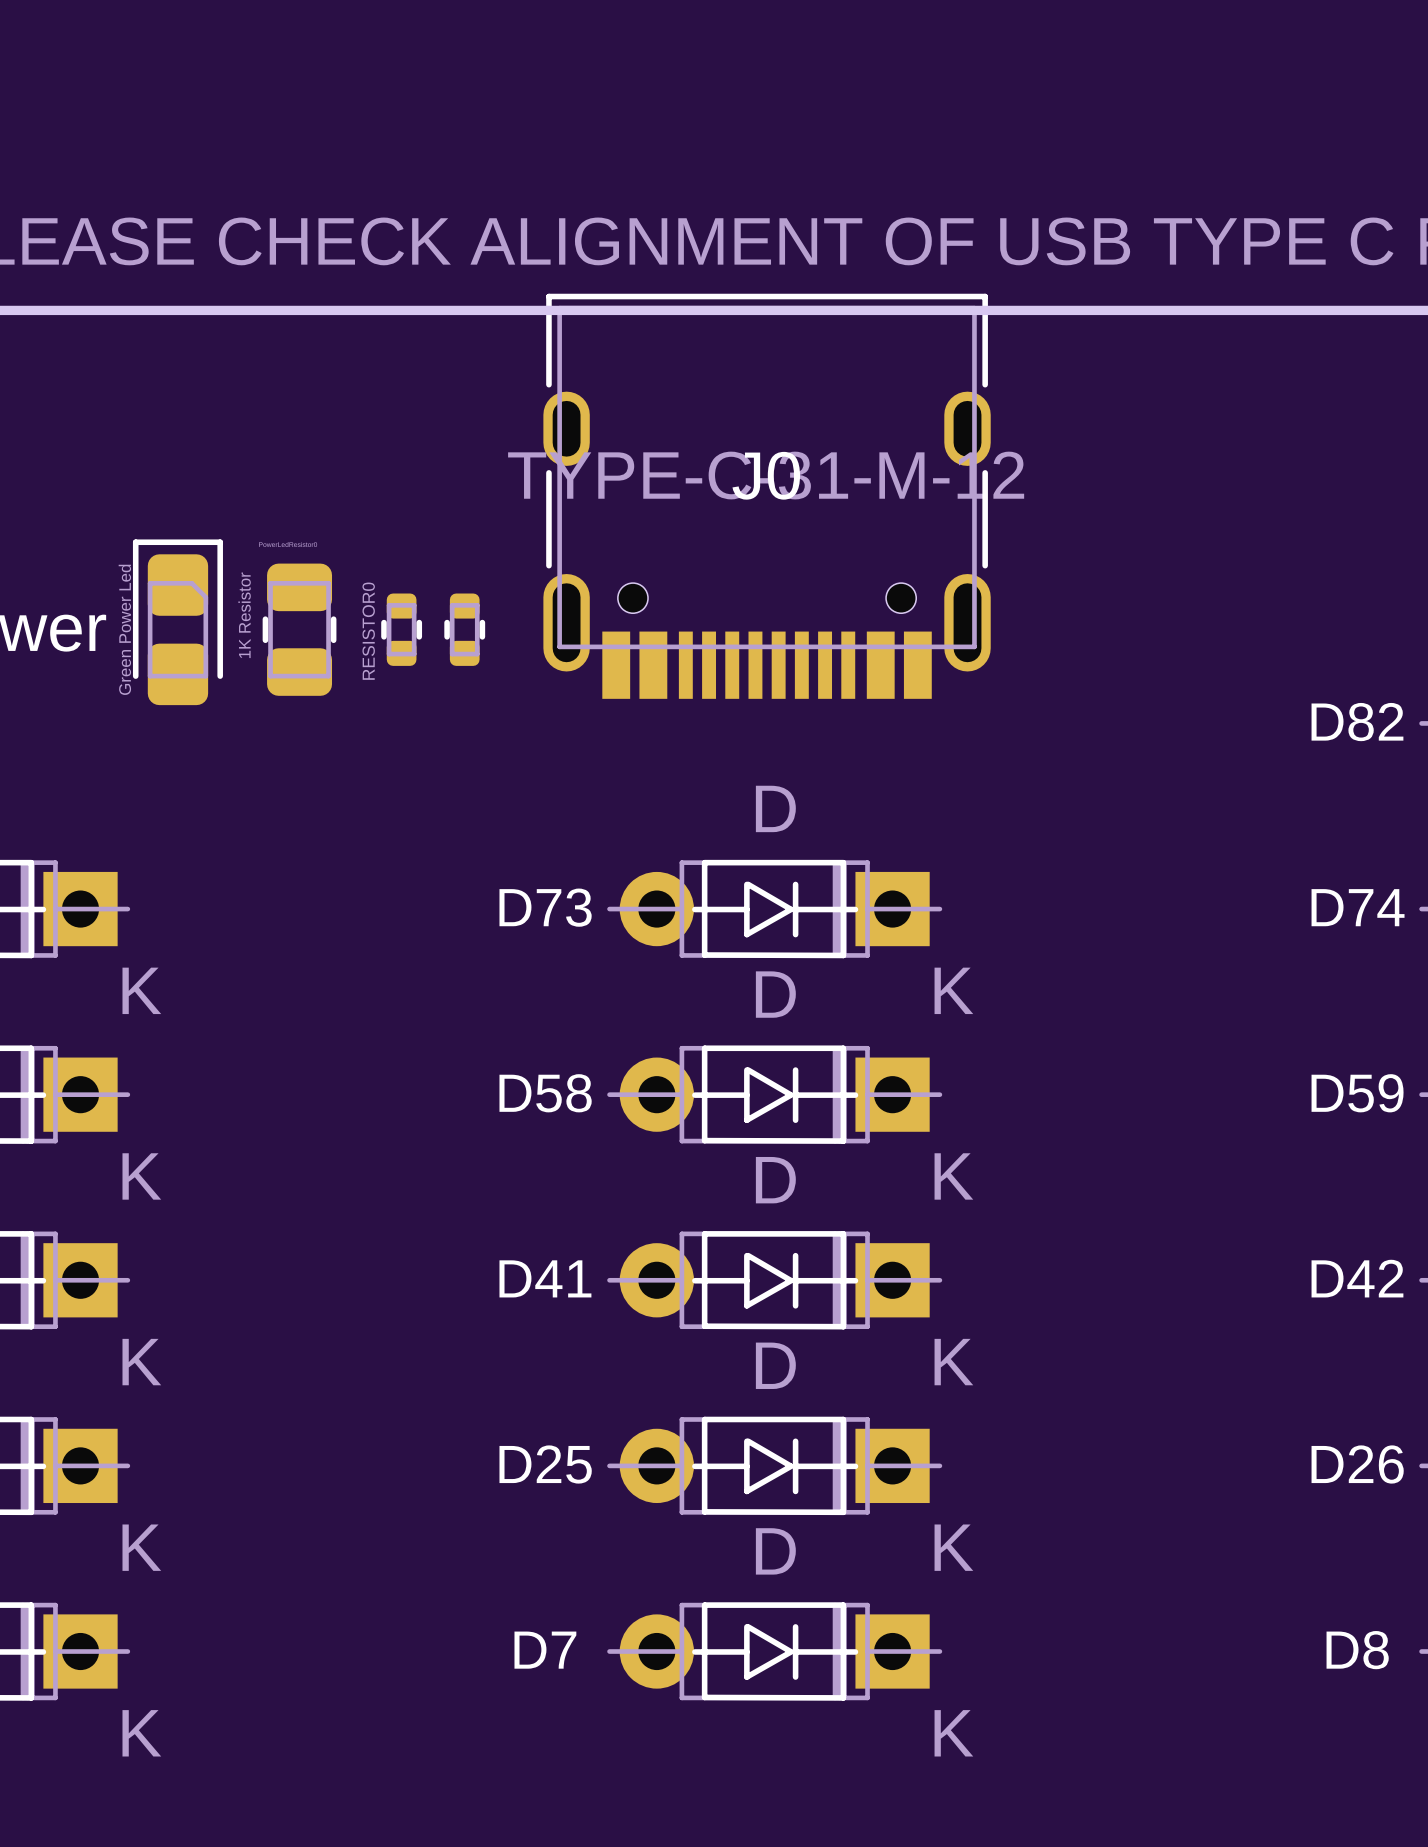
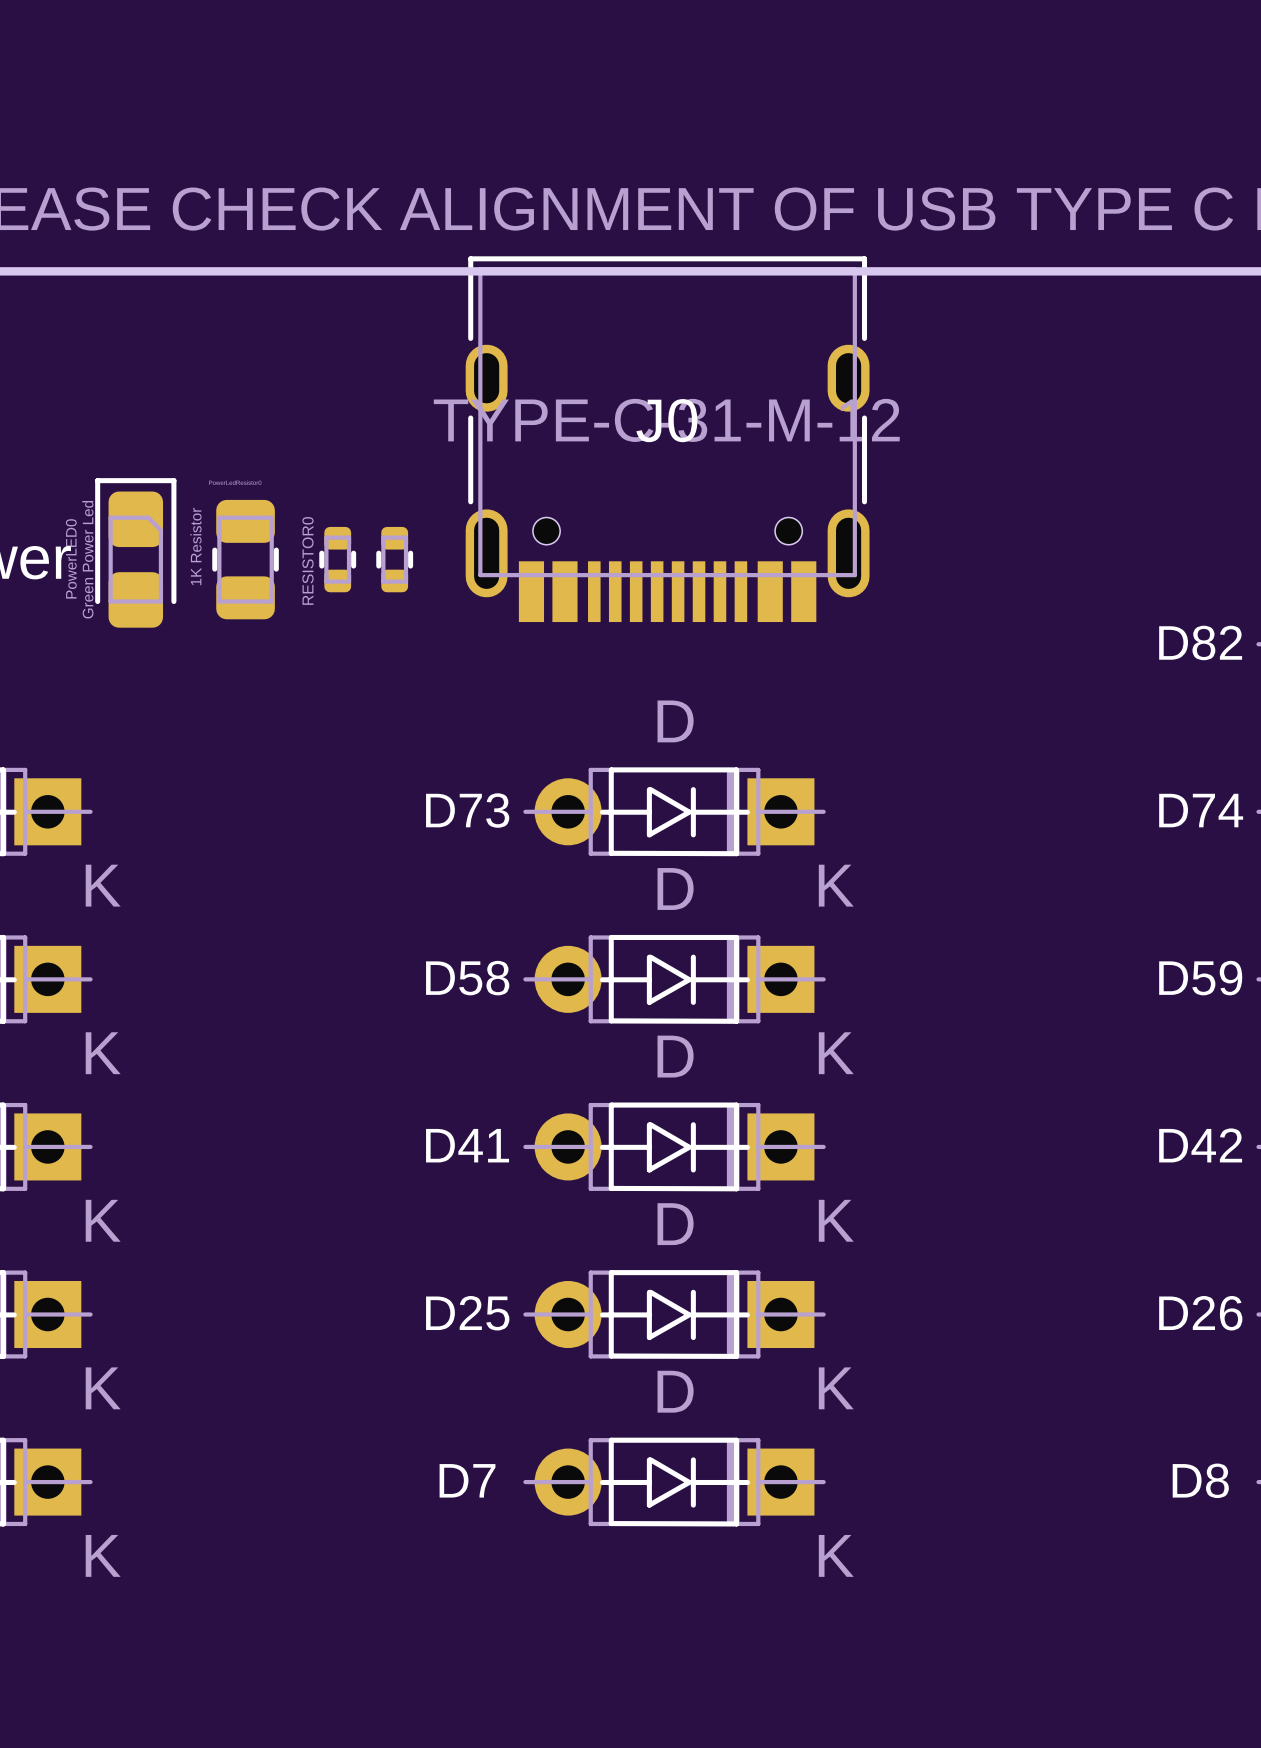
PowerLED0 name: none -> PowerLED0 (71, 558)

